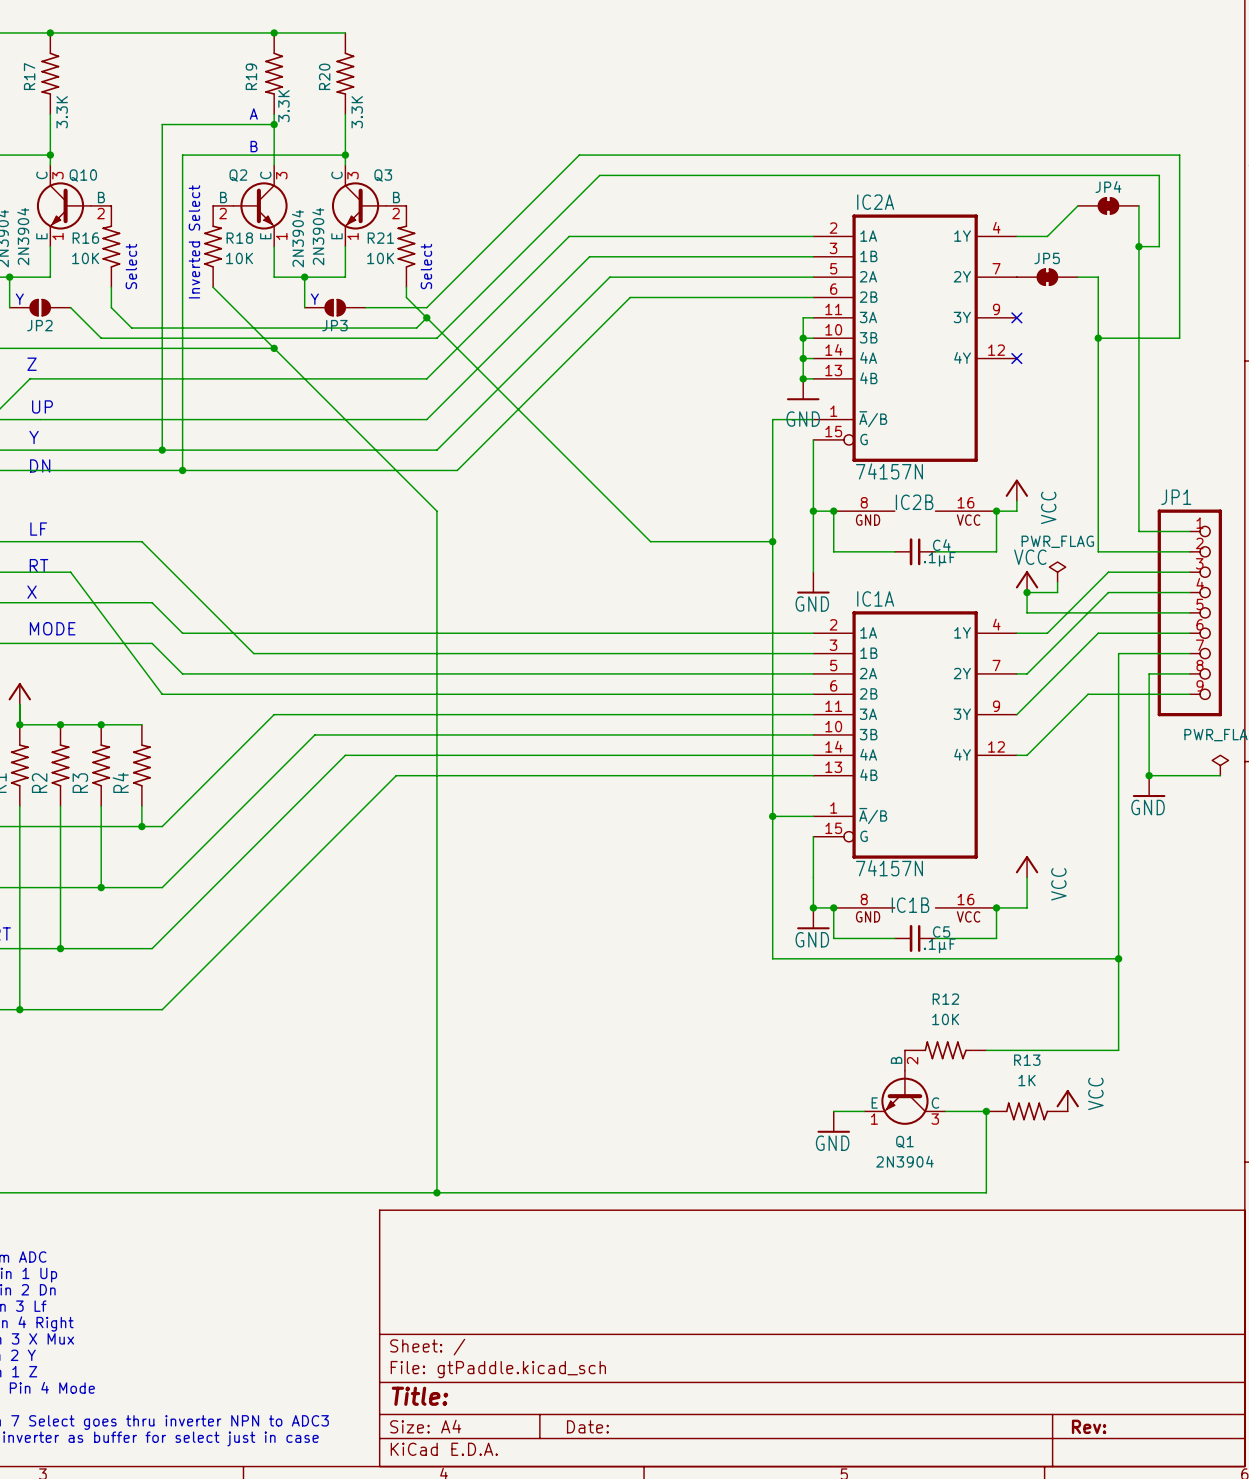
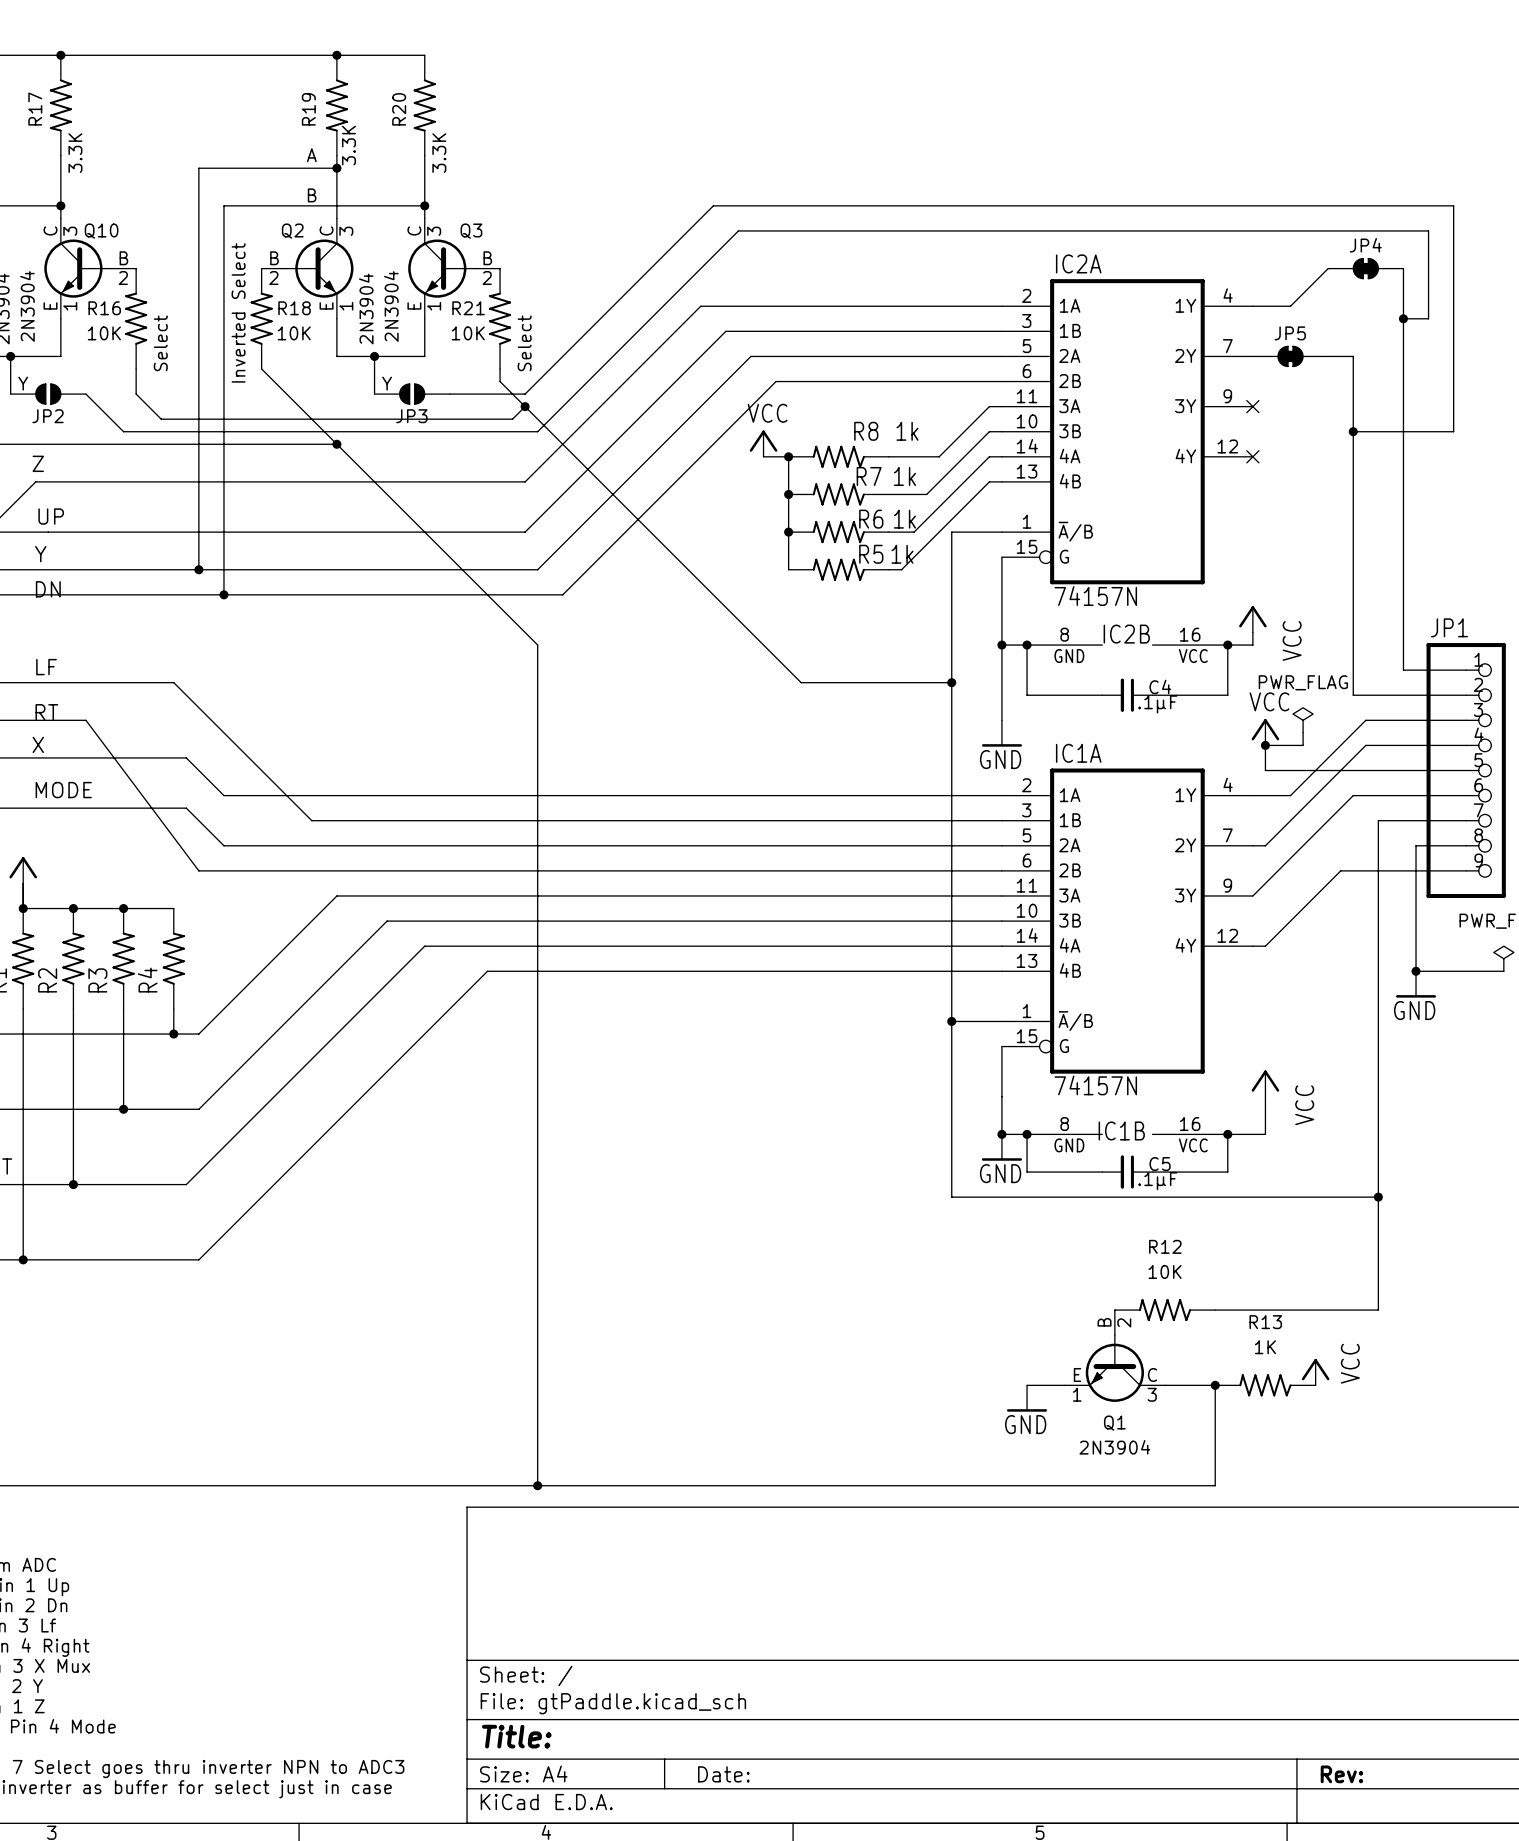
wire: (803, 317) (803, 378) -> (989, 406) (939, 456) (889, 456)
wire: none -> (989, 431) (926, 494) (889, 494)
junction: (803, 338) -> none
power symbol: none -> VCC (763, 443)
wire: none -> (763, 456) (788, 456) (788, 569)
junction: none -> (788, 456)
R8: none -> 1k (838, 456)
wire: none -> (989, 456) (914, 532) (889, 532)
junction: (803, 358) -> none
wire: none -> (989, 481) (901, 569) (889, 569)
junction: (803, 378) -> none
junction: none -> (788, 494)
R7: none -> 1k (838, 494)
power symbol: GND (803, 389) -> none
junction: none -> (788, 532)
R6: none -> 1k (838, 532)
R5: none -> 1k (838, 569)

